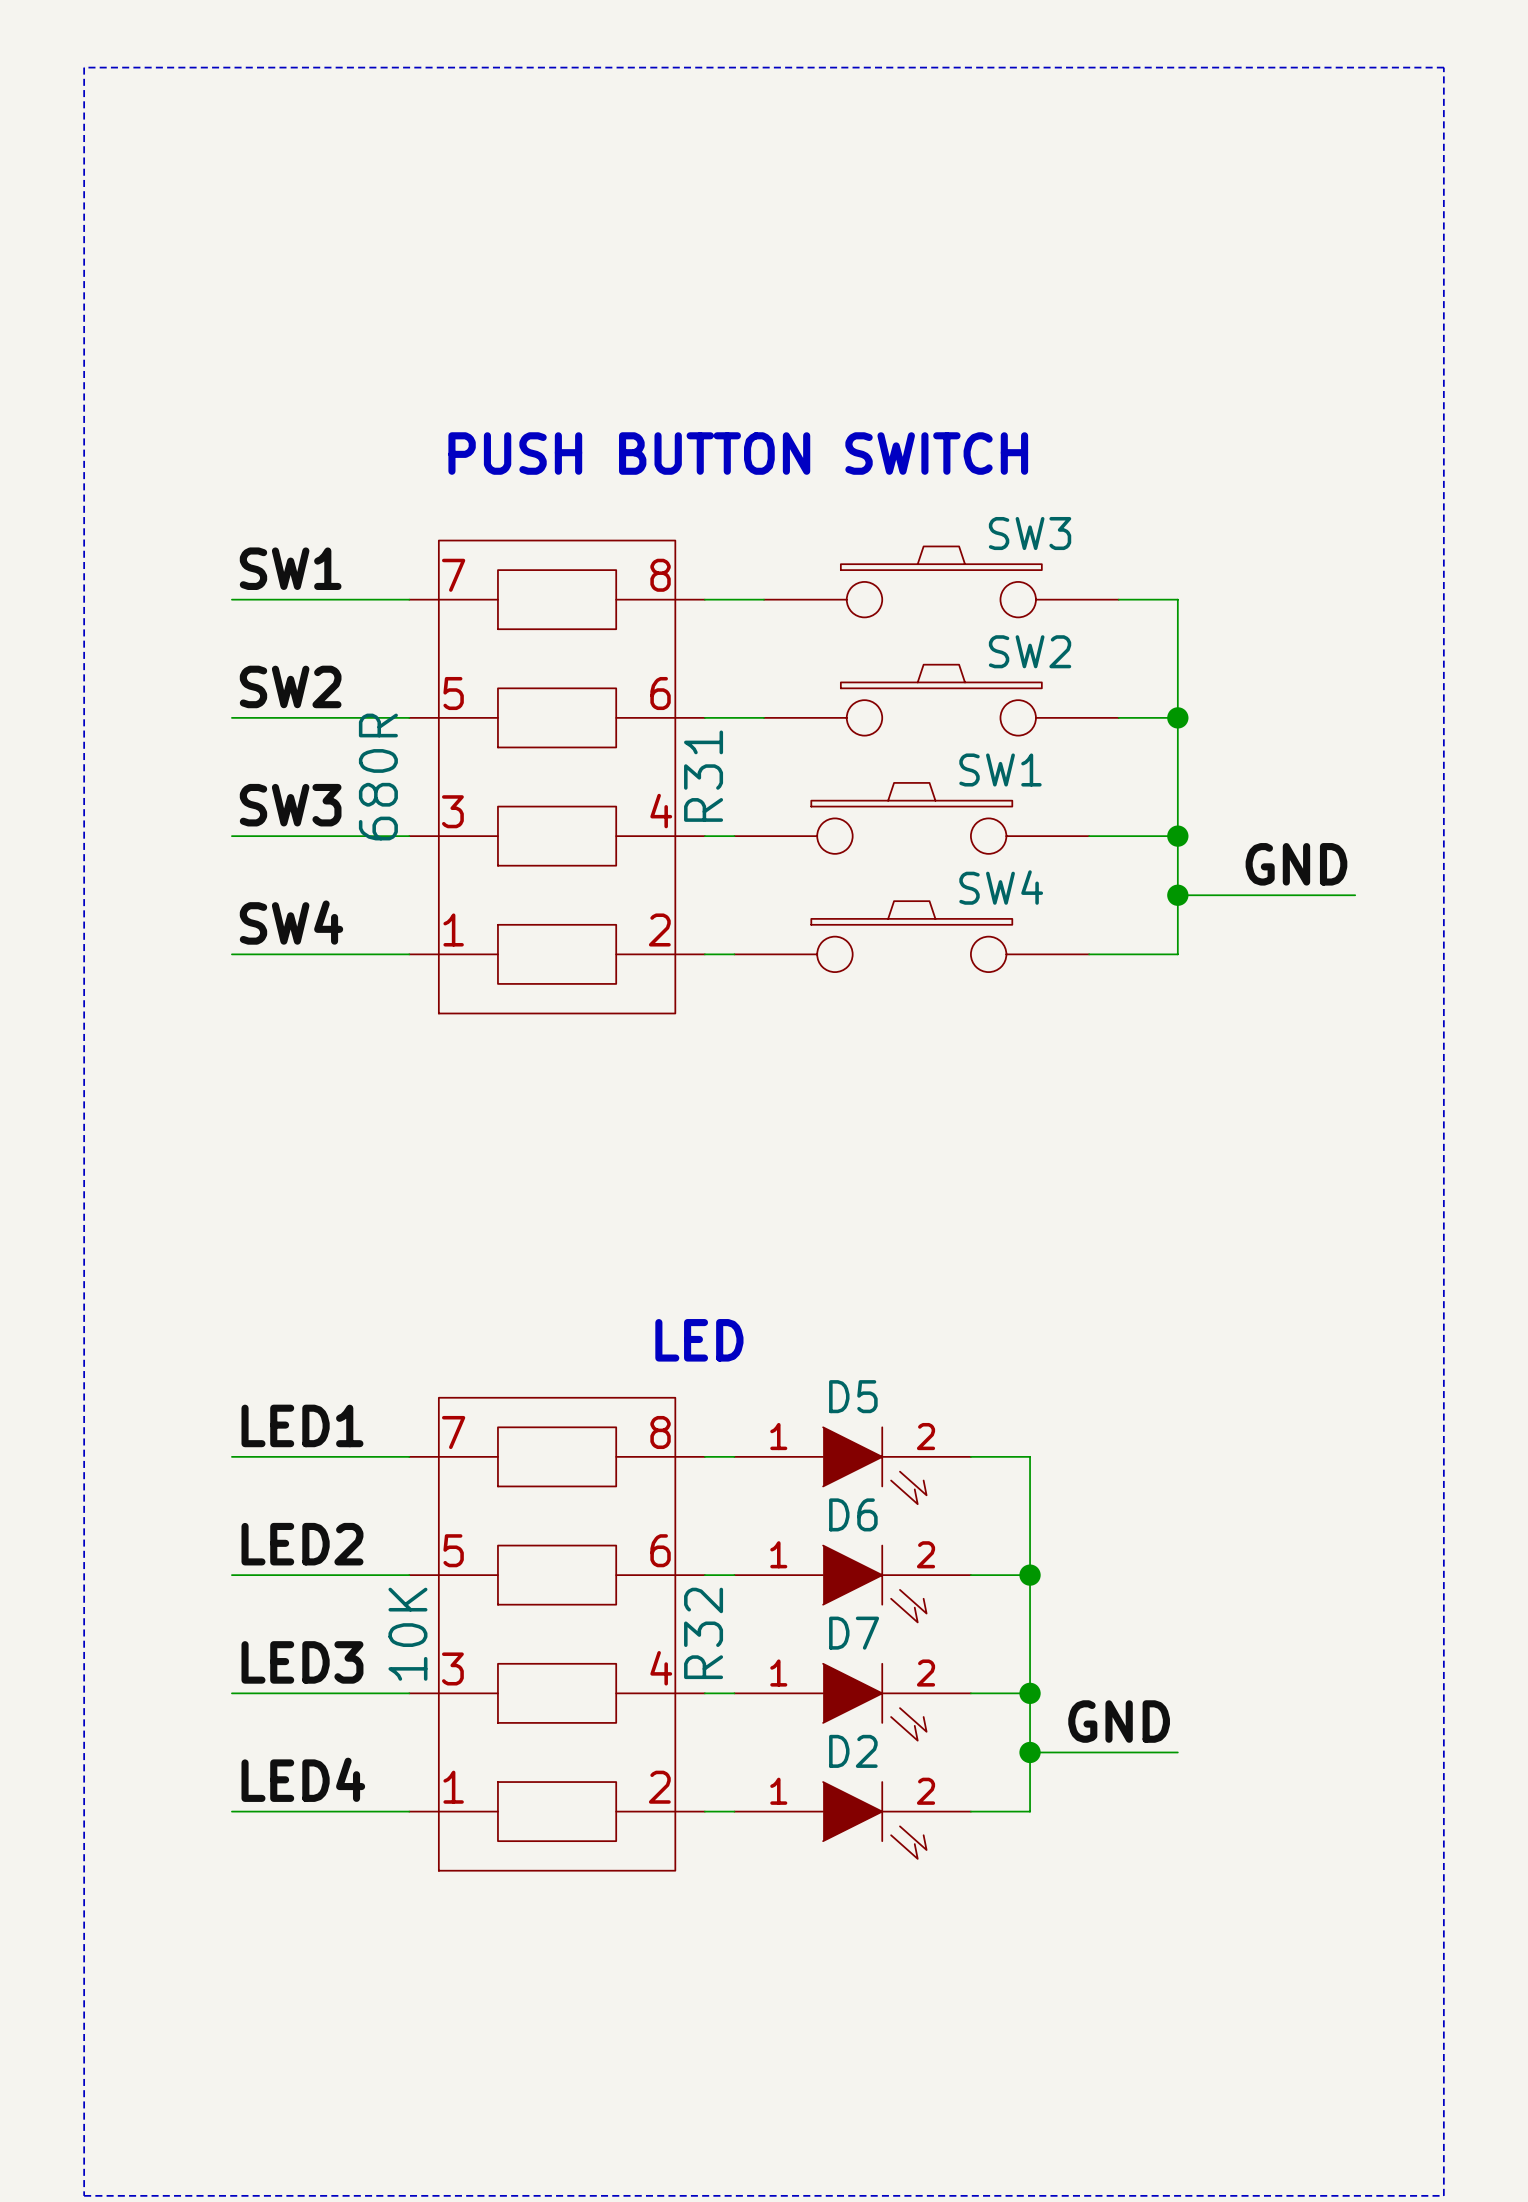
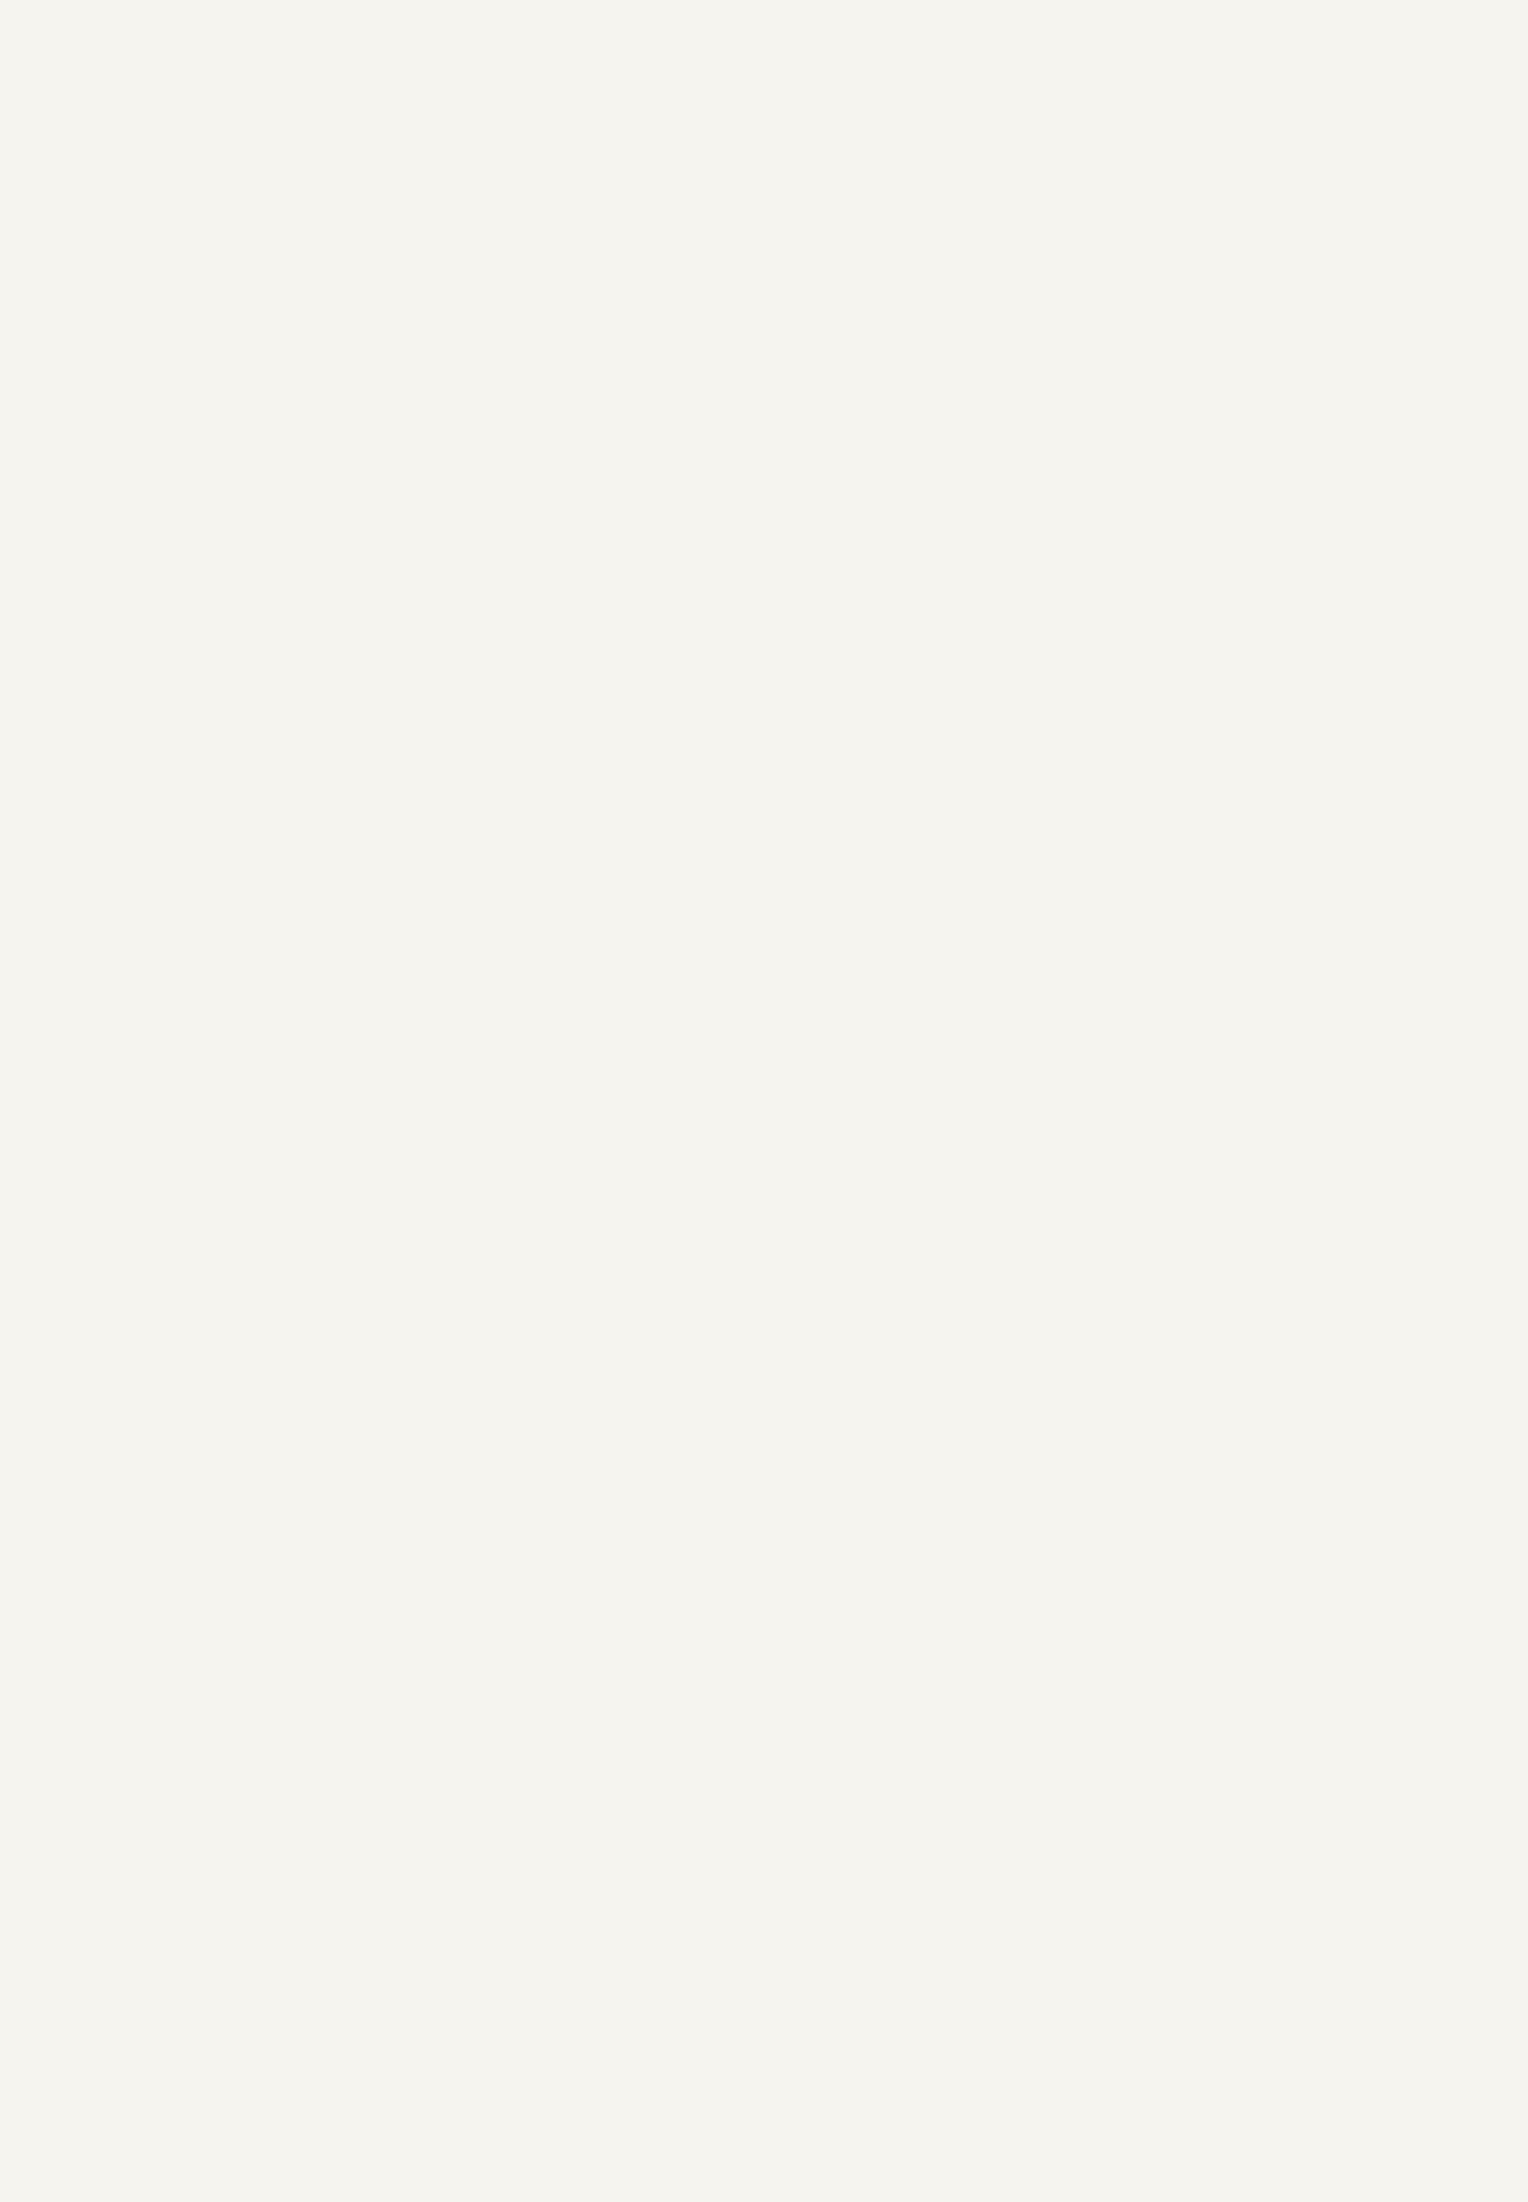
line: (84, 67) (1443, 67) (1443, 2195) (84, 2195) (84, 67) -> none
text: PUSH BUTTON SWITCH (738, 453) -> none
label: SW1 (290, 568) -> none
SW3: (941, 581) -> none
wire: (231, 599) (409, 599) -> none
wire: (704, 599) (764, 599) -> none
wire: (1118, 599) (1177, 599) (1177, 954) (1089, 954) -> none
label: SW2 (290, 686) -> none
SW2: (941, 700) -> none
wire: (231, 717) (409, 717) -> none
wire: (704, 717) (764, 717) -> none
wire: (1118, 717) (1177, 717) -> none
junction: (1177, 717) -> none
R31: 680R (557, 777) -> none
label: SW3 (290, 805) -> none
SW1: (911, 818) -> none
wire: (231, 836) (409, 836) -> none
wire: (704, 836) (734, 836) -> none
wire: (1089, 836) (1177, 836) -> none
junction: (1177, 836) -> none
label: GND (1296, 864) -> none
wire: (1177, 895) (1355, 895) -> none
junction: (1177, 895) -> none
label: SW4 (291, 922) -> none
SW4: (911, 936) -> none
wire: (231, 954) (409, 954) -> none
wire: (704, 954) (734, 954) -> none
text: LED (699, 1340) -> none
label: LED1 (302, 1425) -> none
wire: (231, 1456) (409, 1456) -> none
wire: (704, 1456) (734, 1456) -> none
wire: (970, 1456) (1030, 1456) (1030, 1811) (970, 1811) -> none
D5: (852, 1465) -> none
label: LED2 (302, 1544) -> none
wire: (231, 1575) (409, 1575) -> none
wire: (704, 1575) (734, 1575) -> none
wire: (970, 1575) (1030, 1575) -> none
junction: (1030, 1575) -> none
D6: (852, 1583) -> none
R32: 10K (557, 1634) -> none
label: LED3 (302, 1662) -> none
wire: (231, 1693) (409, 1693) -> none
wire: (704, 1693) (734, 1693) -> none
wire: (970, 1693) (1030, 1693) -> none
junction: (1030, 1693) -> none
D7: (852, 1702) -> none
label: GND (1119, 1721) -> none
wire: (1030, 1752) (1177, 1752) -> none
junction: (1030, 1752) -> none
label: LED4 (303, 1779) -> none
wire: (231, 1811) (409, 1811) -> none
wire: (704, 1811) (734, 1811) -> none
D2: (852, 1820) -> none

